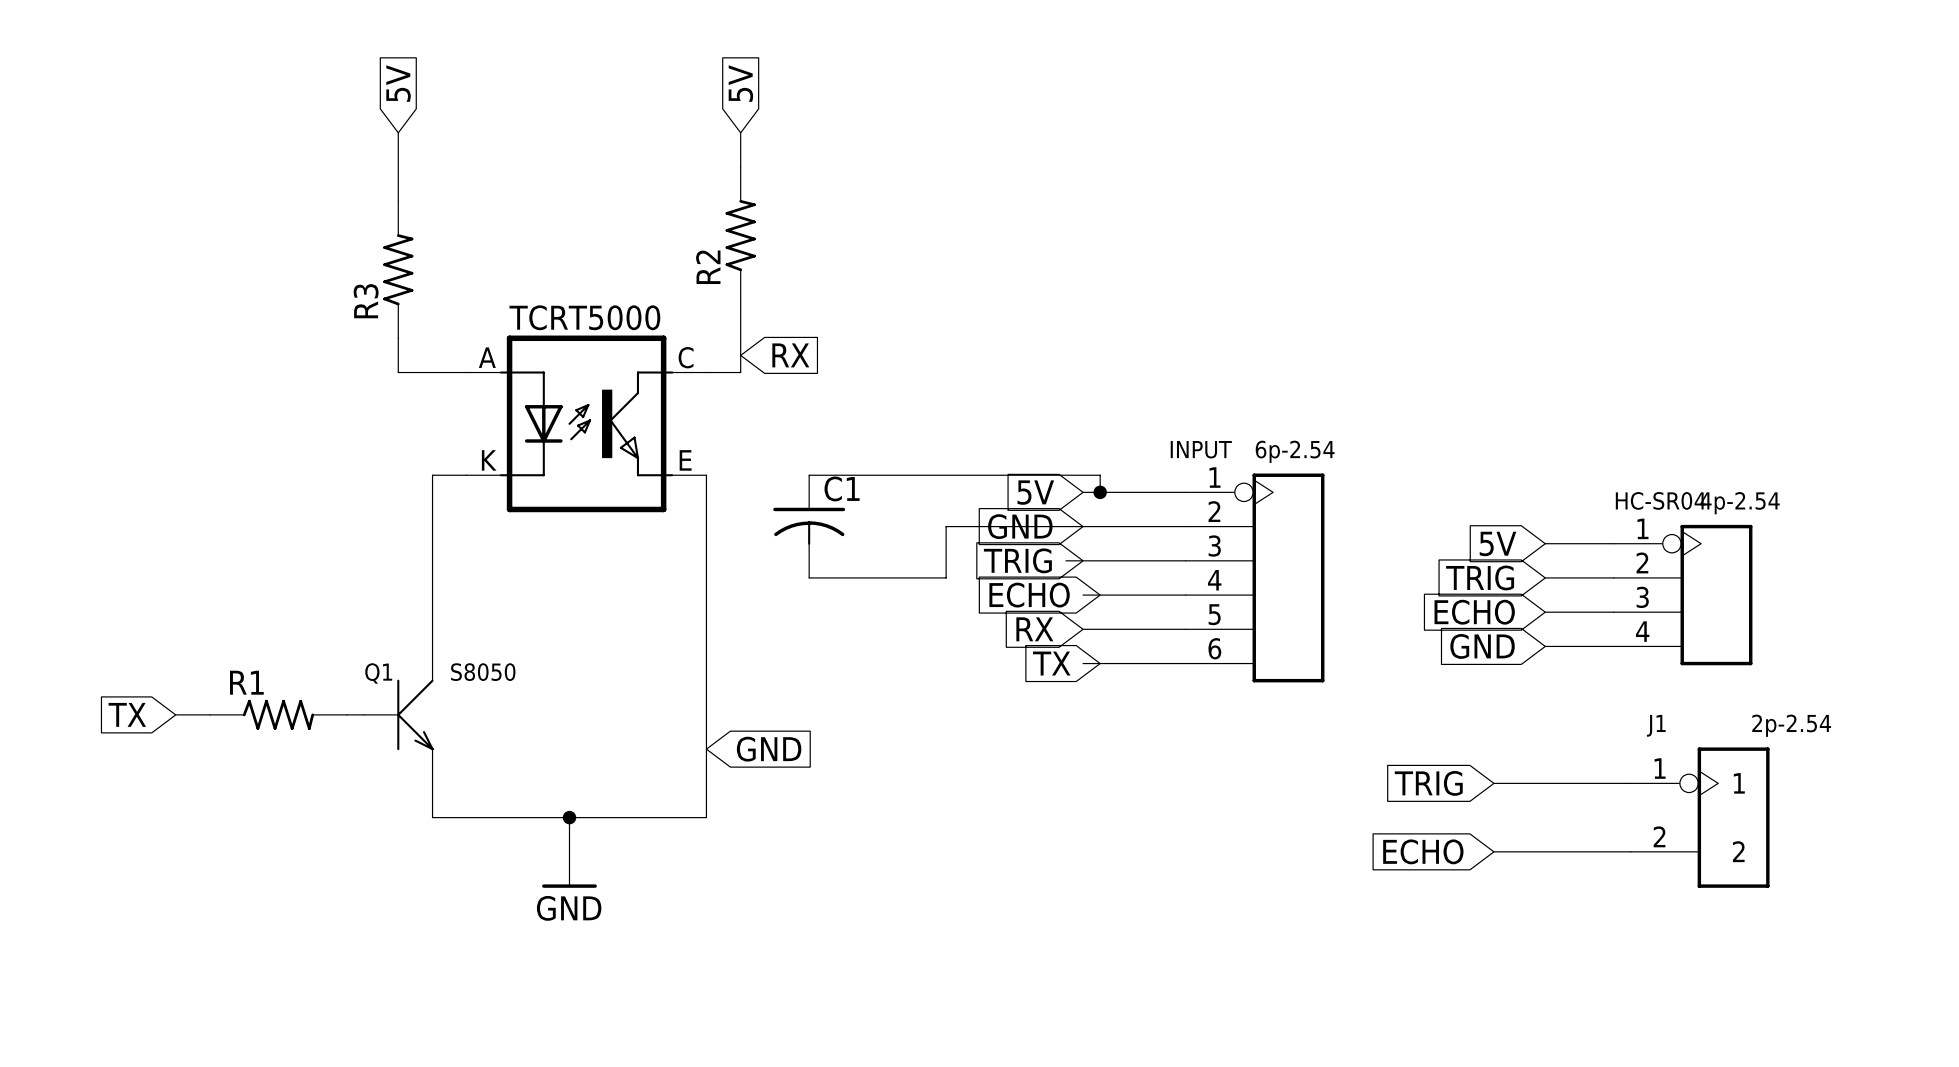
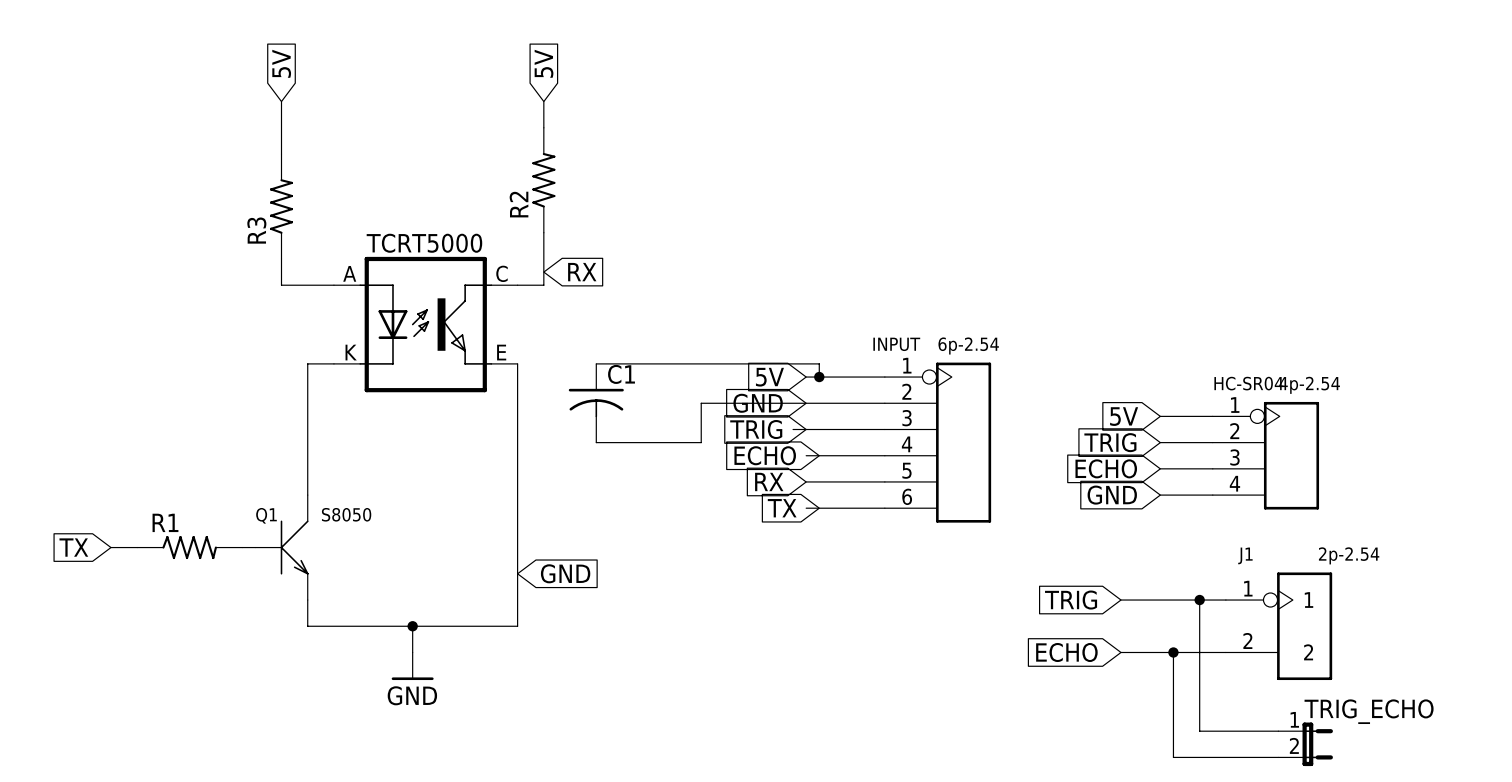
wire: none -> (1199, 600) (1199, 731) (1278, 731)
junction: none -> (1199, 600)
wire: none -> (1173, 652) (1173, 757) (1278, 757)
junction: none -> (1173, 652)
TRIG_ECHO: none -> (1305, 744)

